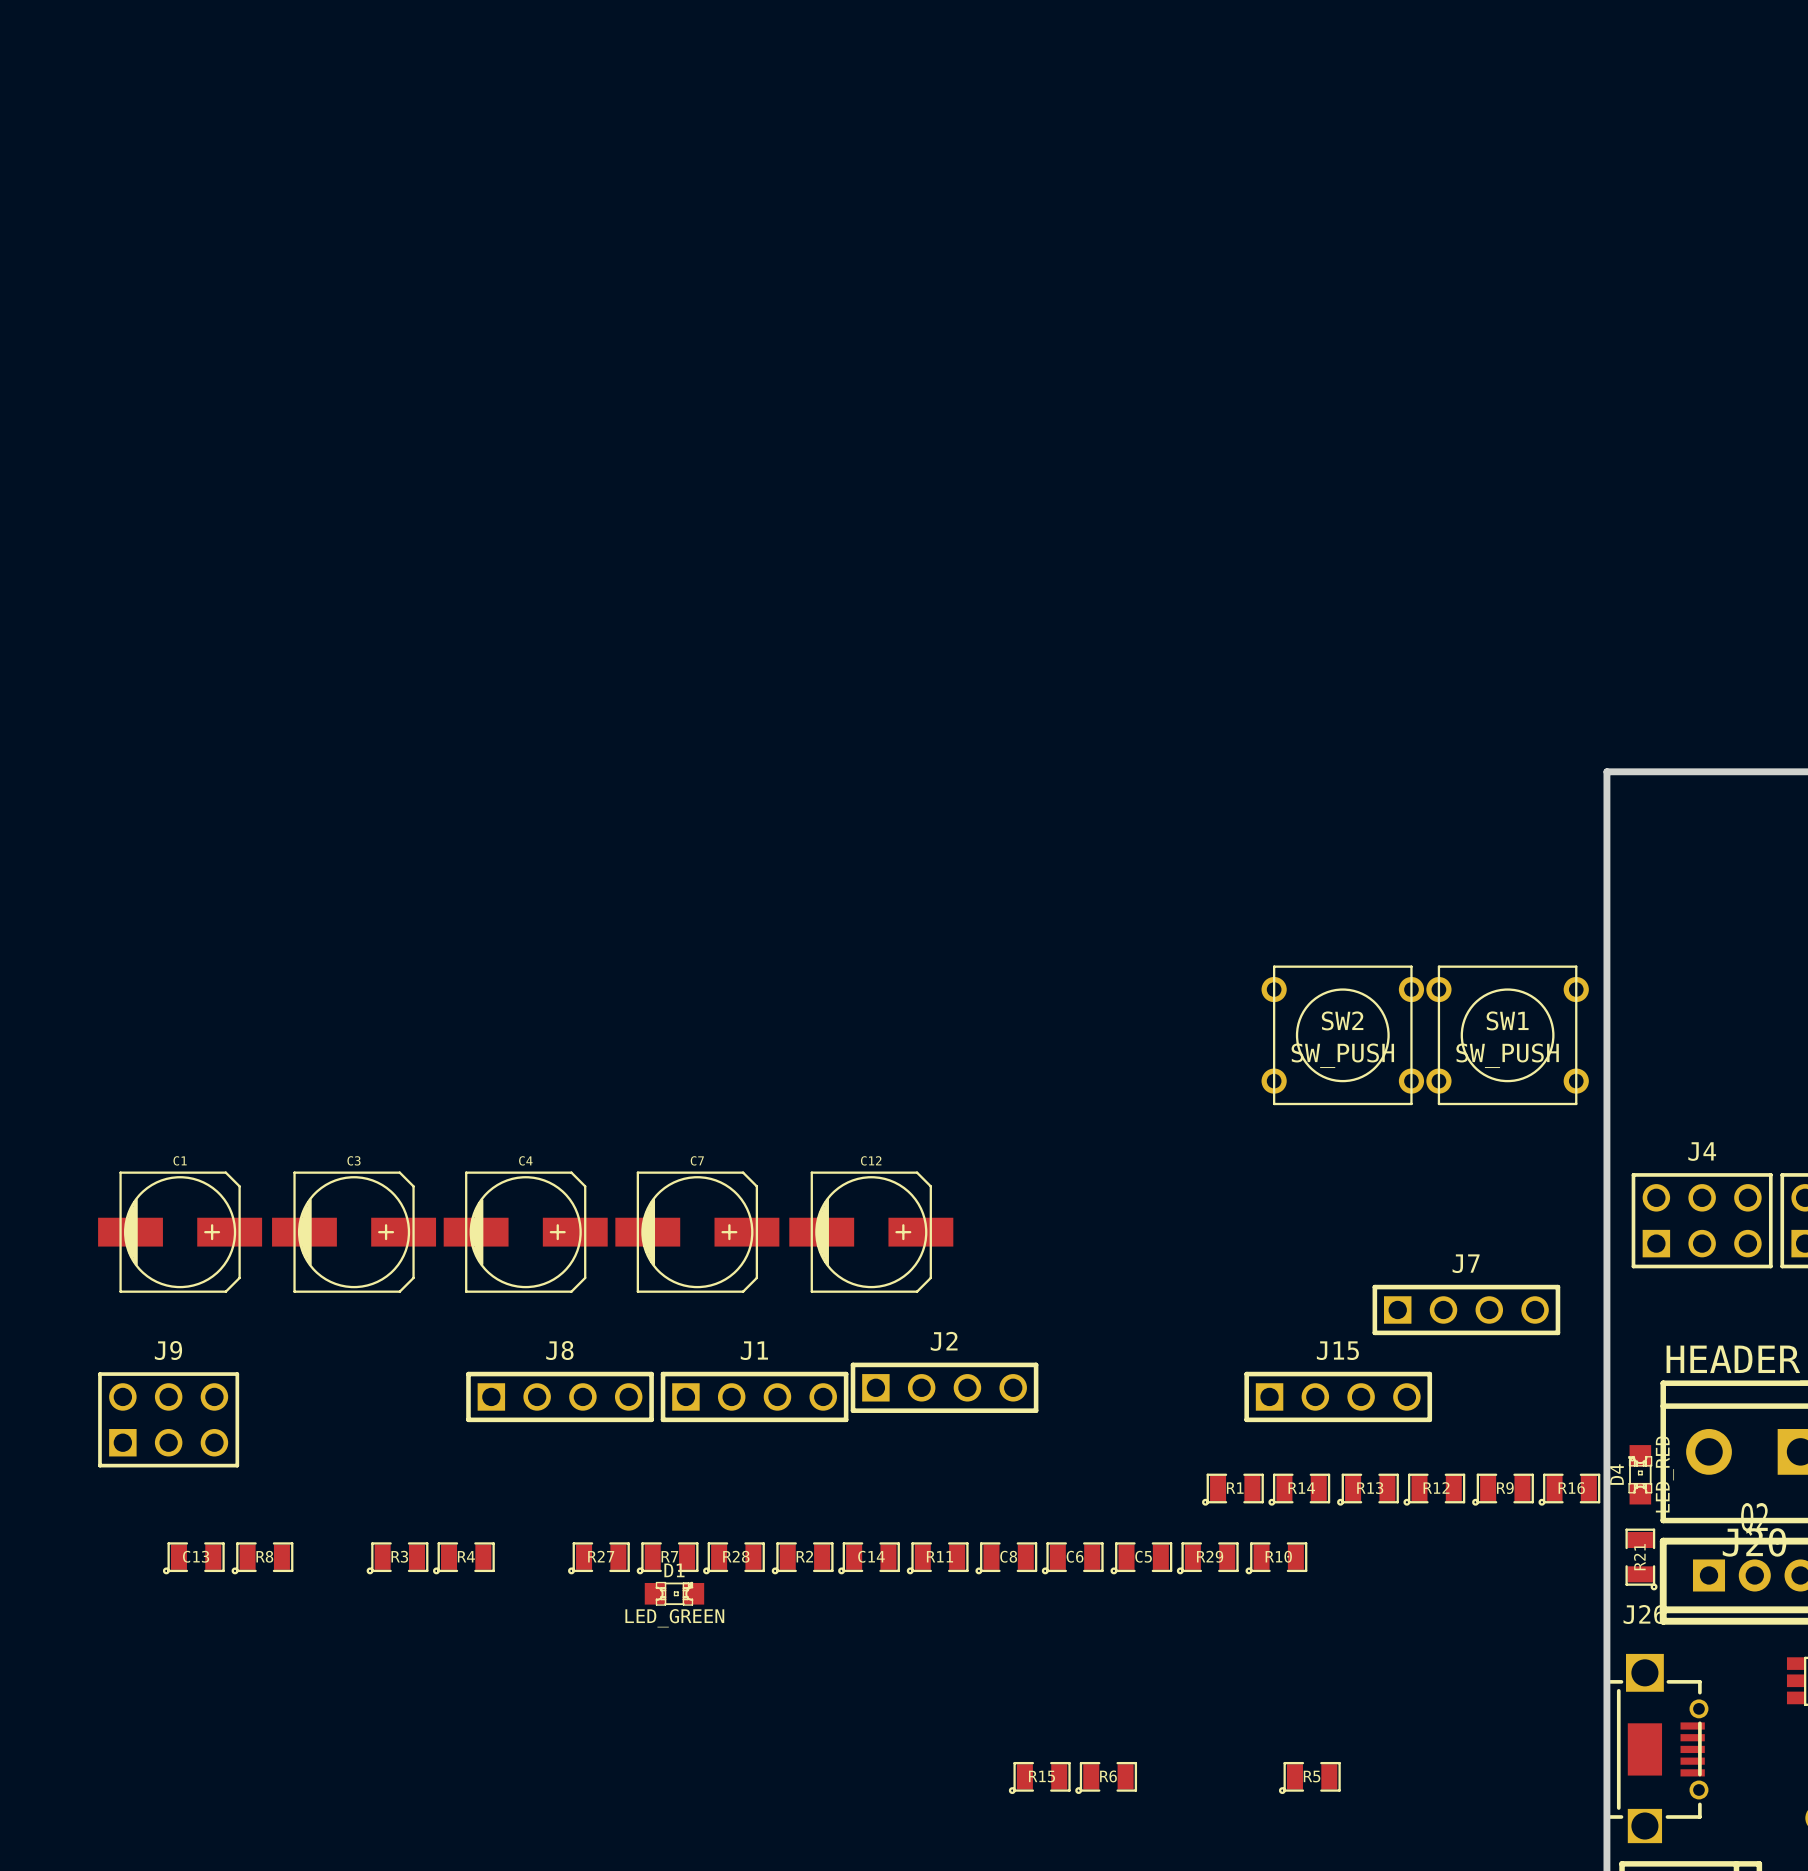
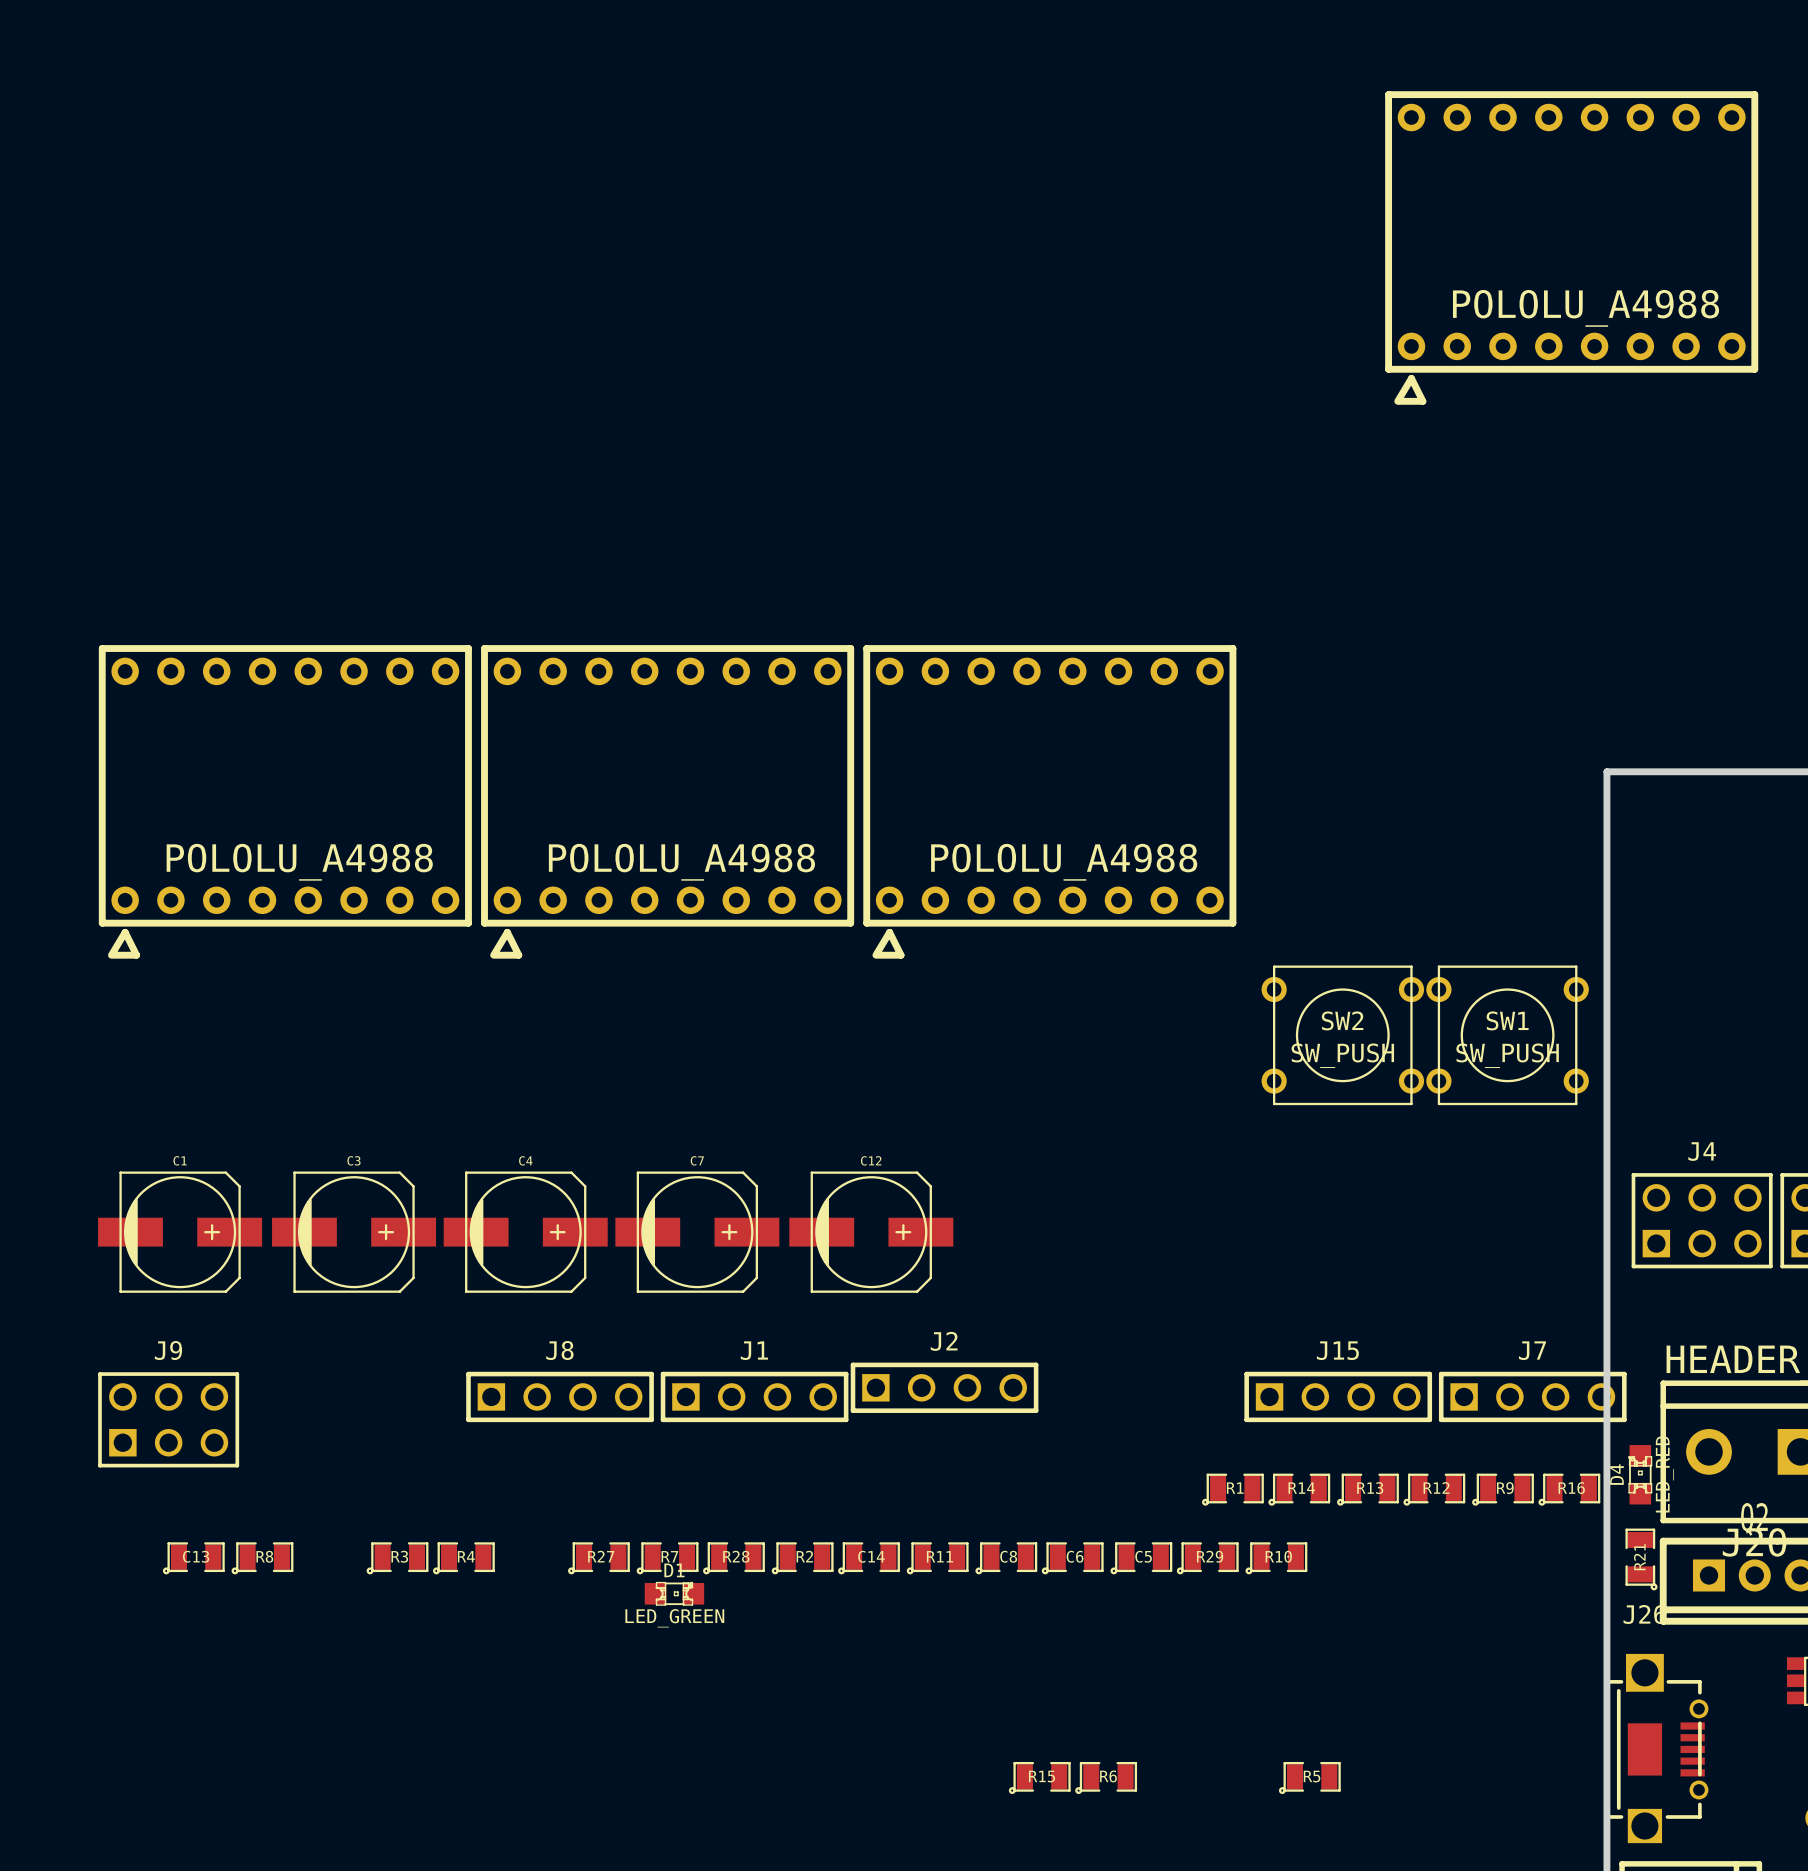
part: none -> POLOLU_A4988 (1571, 247)
part: none -> POLOLU_A4988 (285, 801)
part: none -> POLOLU_A4988 (667, 801)
part: none -> POLOLU_A4988 (1049, 801)
J7 position: (1466, 1309) -> (1532, 1396)

